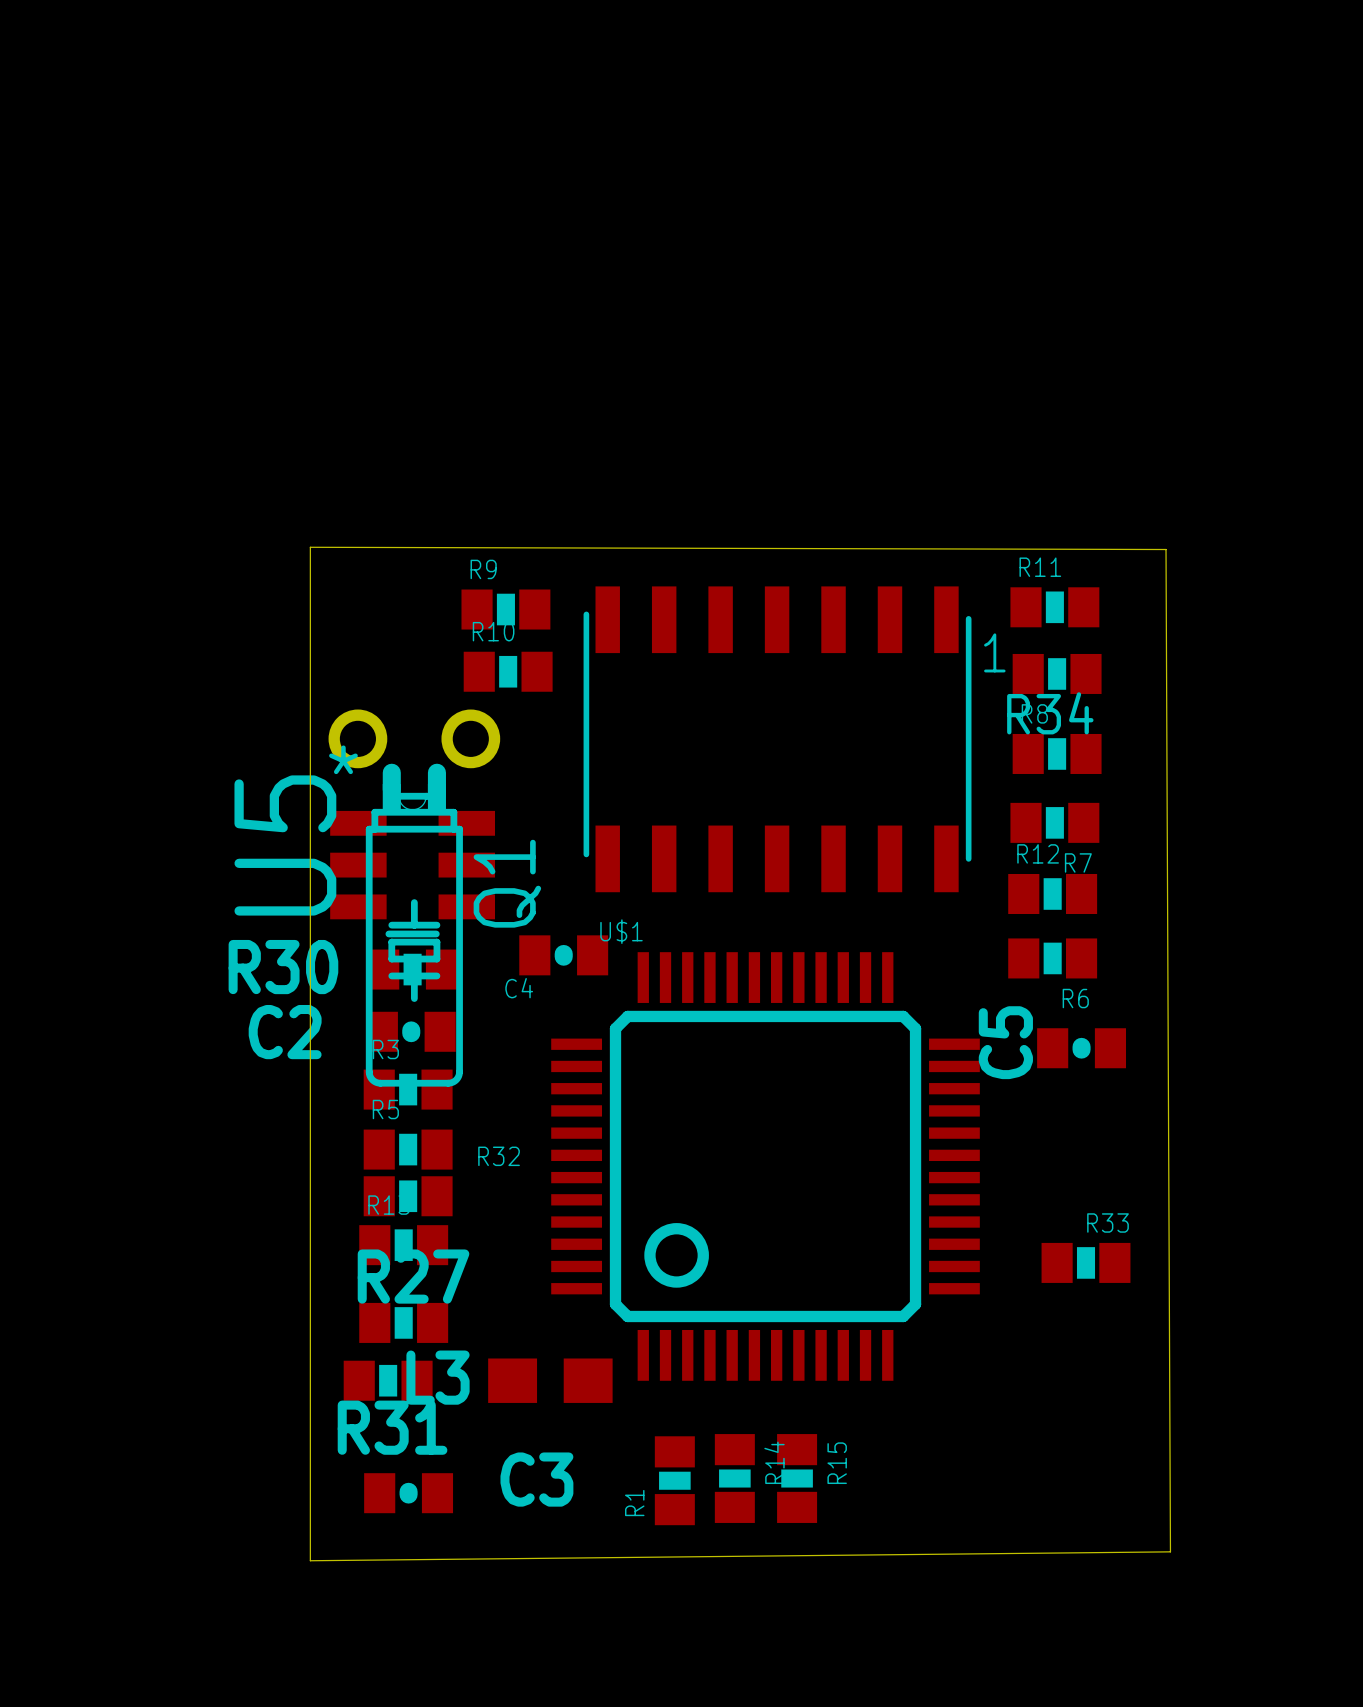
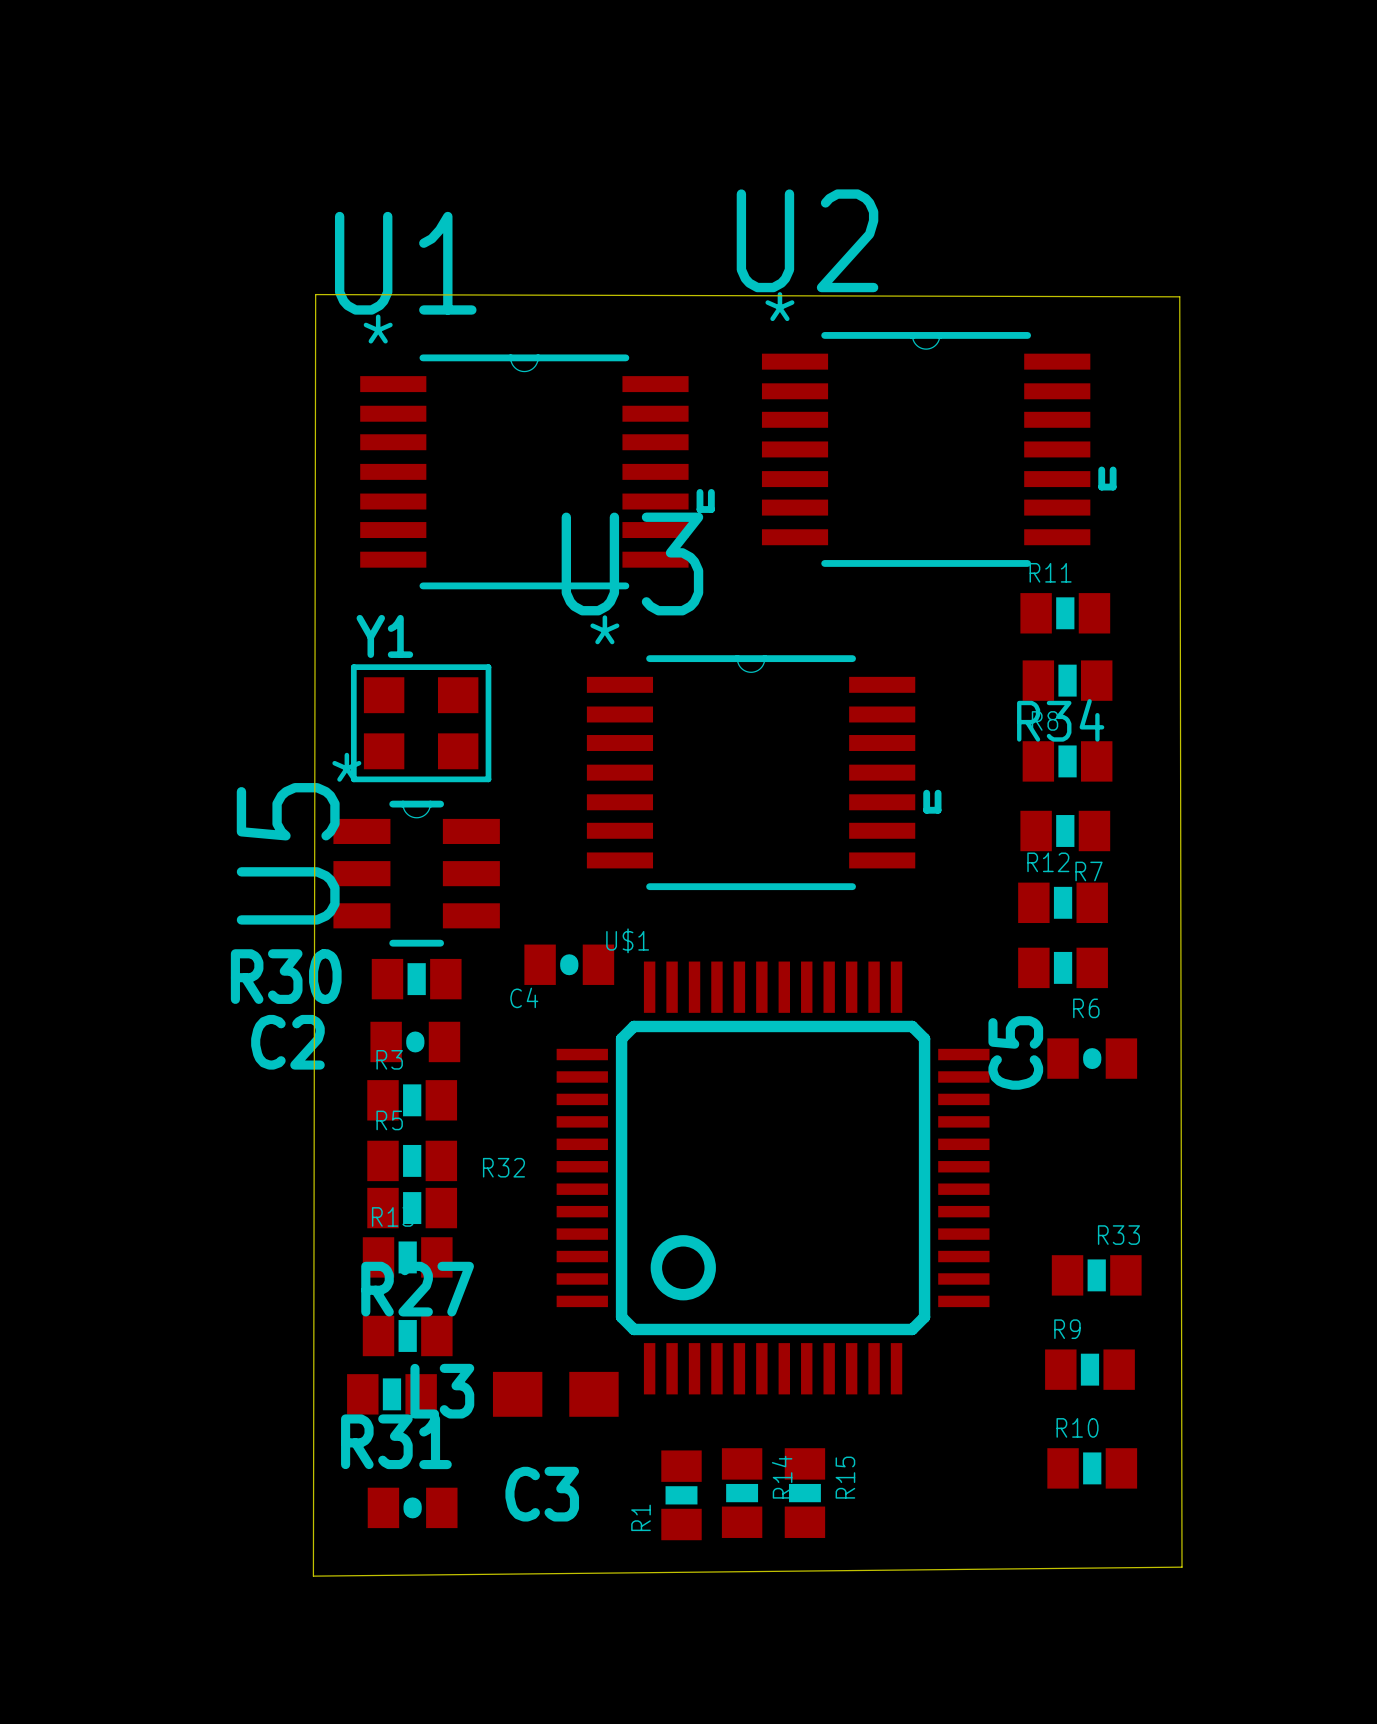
U2: none -> (939, 449)
U1: none -> (537, 471)
R9 position: (505, 609) -> (1089, 1369)
R10 position: (508, 671) -> (1092, 1468)
Y1: none -> (421, 723)
part: (777, 739) -> none
U3: none -> (764, 772)
Q1: (414, 898) -> none
board edge: (1170, 1551) (1166, 549) (310, 547) (310, 1560) -> (1182, 1567) (1179, 296) (315, 294) (313, 1576)

